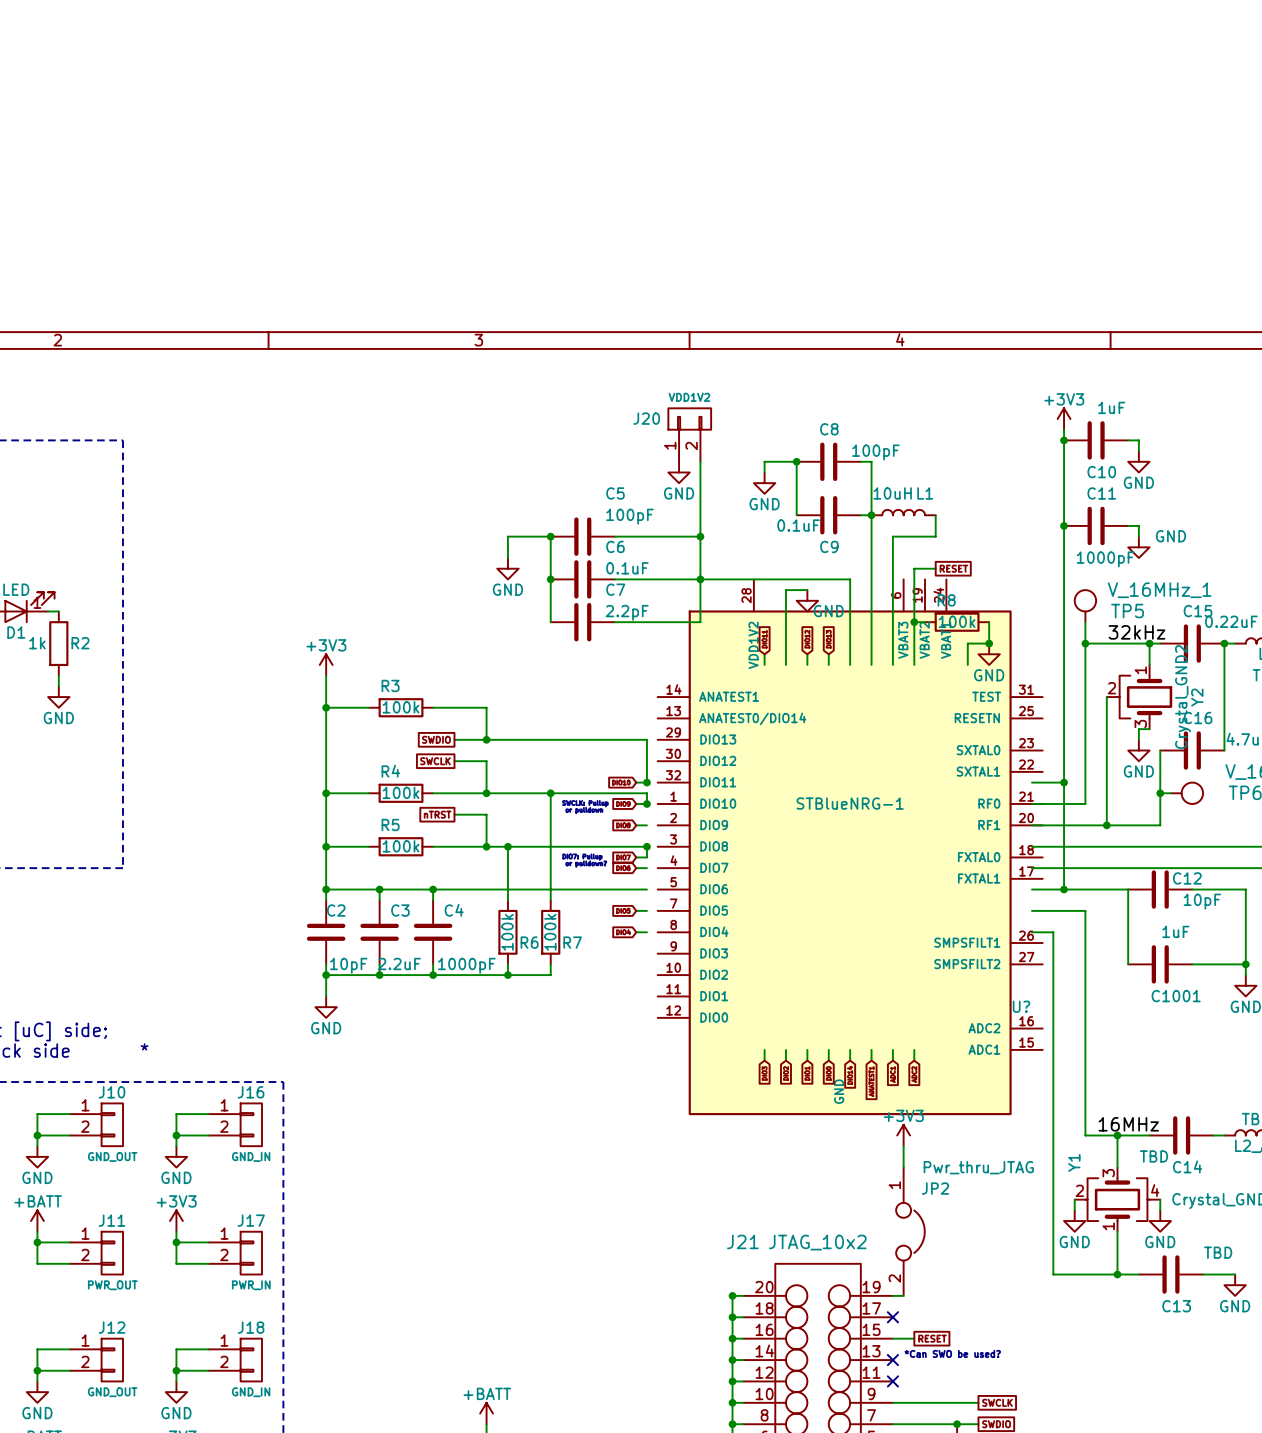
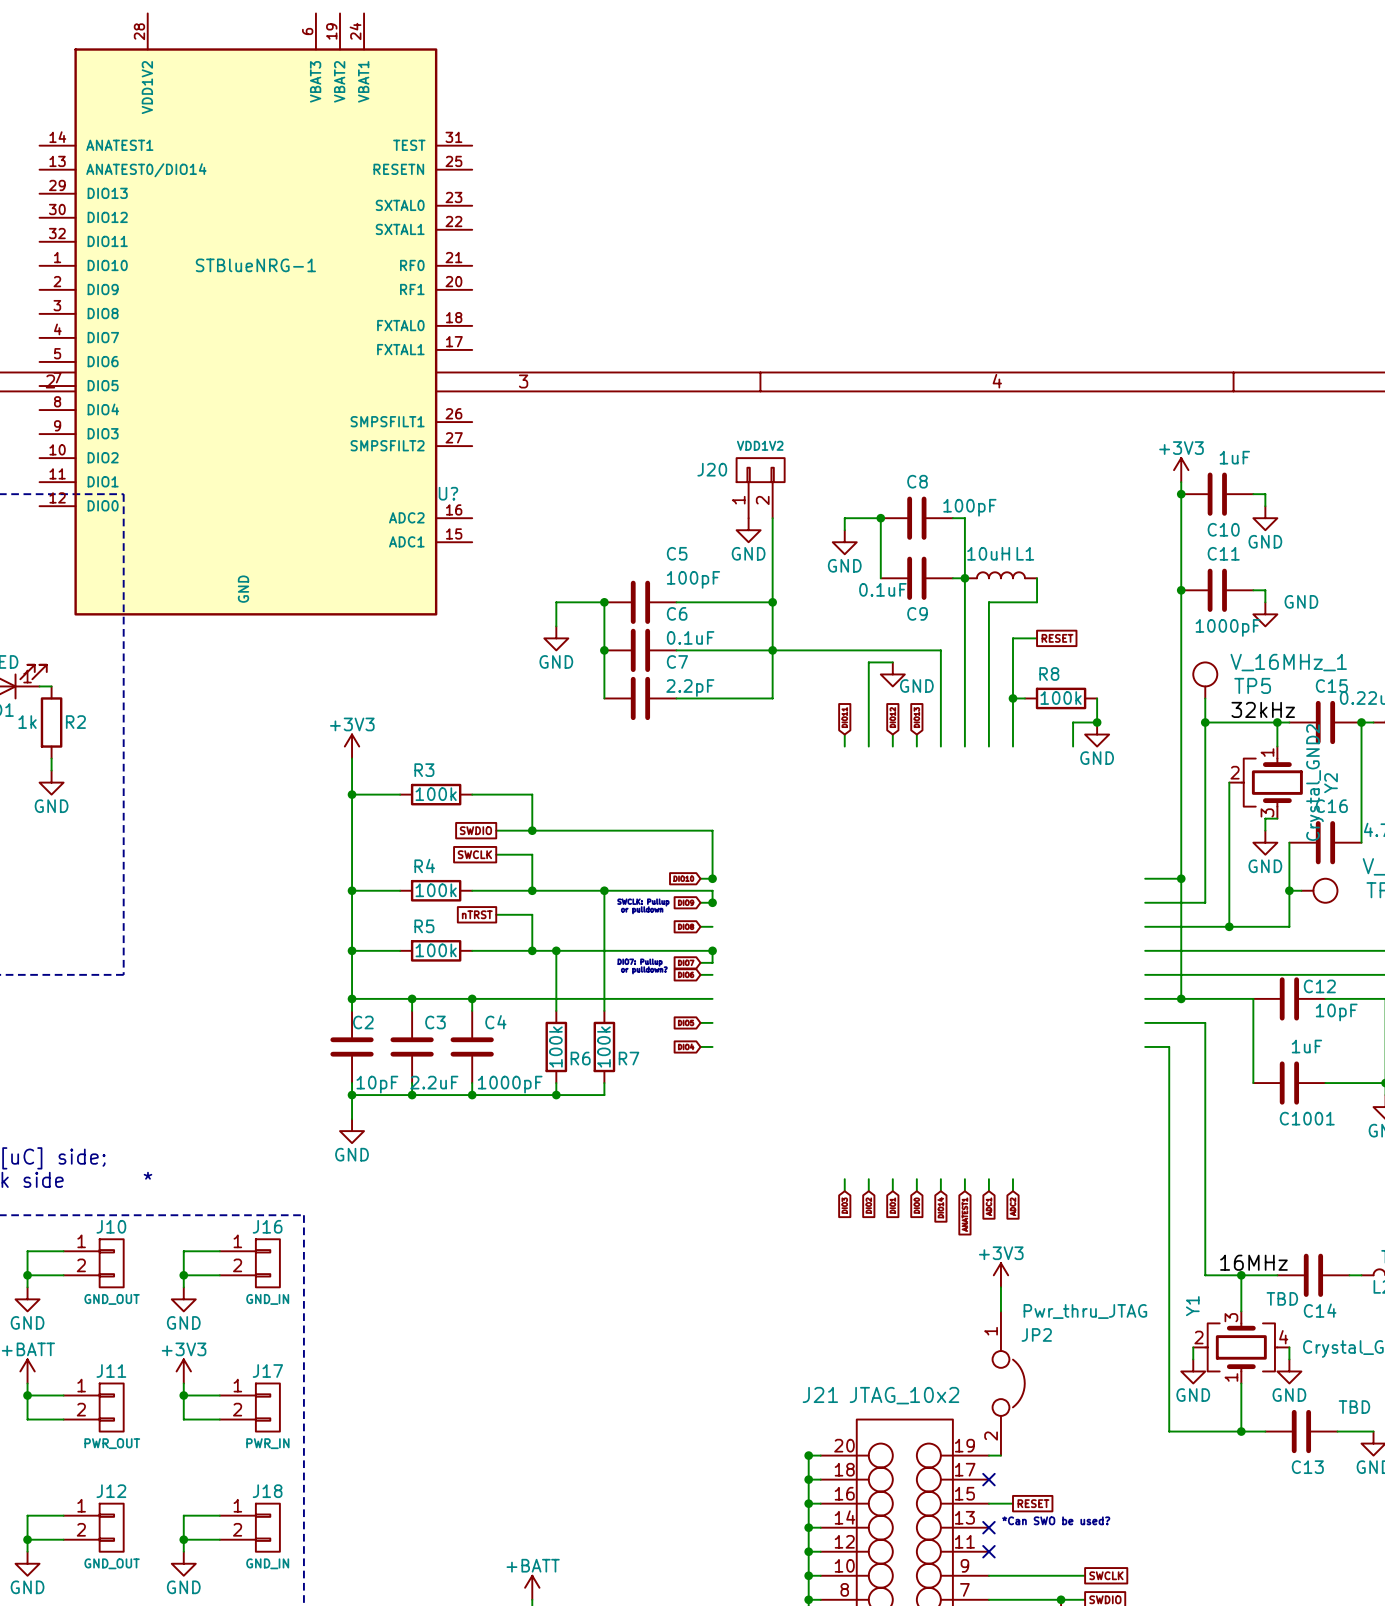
U?: none -> STBlueNRG-1 (255, 314)
U?: STBlueNRG-1 (850, 847) -> none

